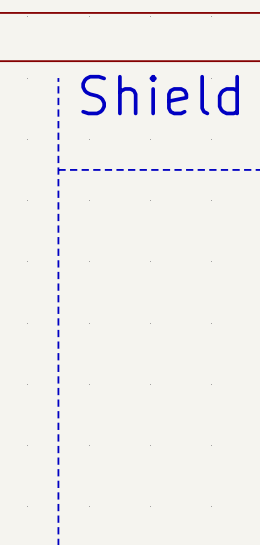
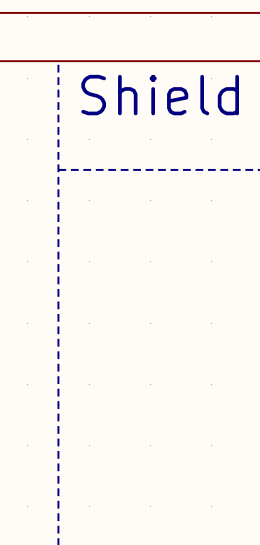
line: none -> (58, 62) (58, 78)

